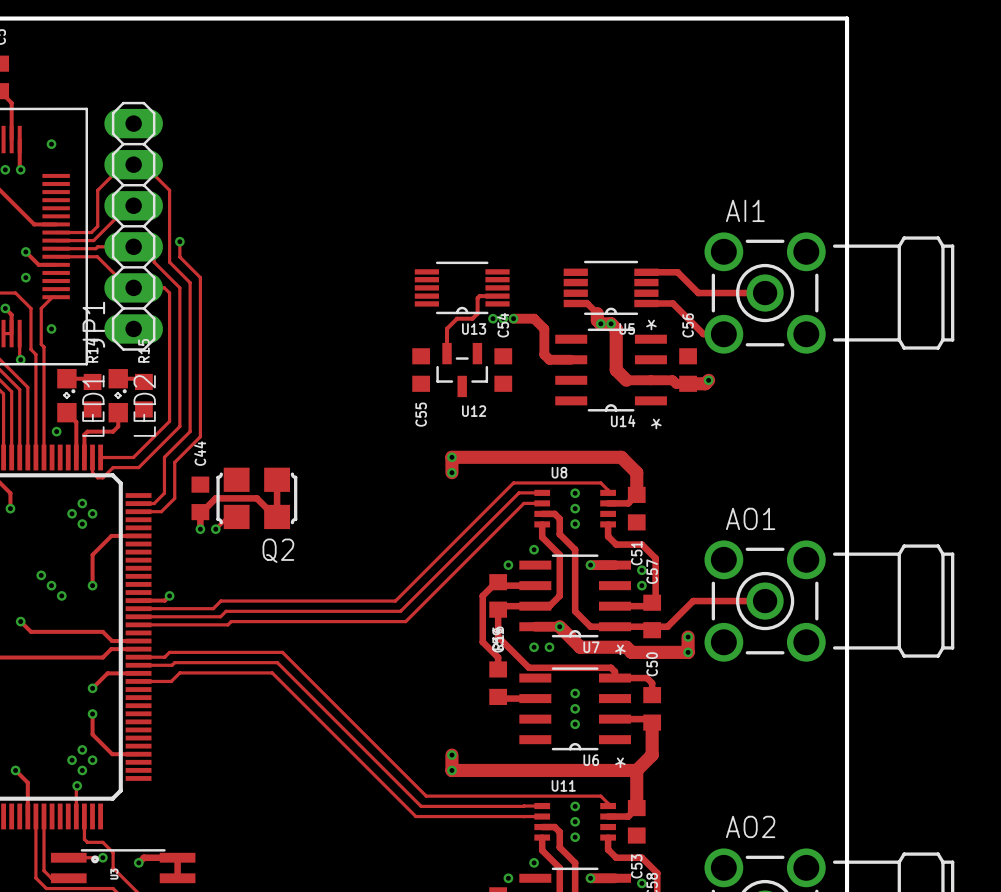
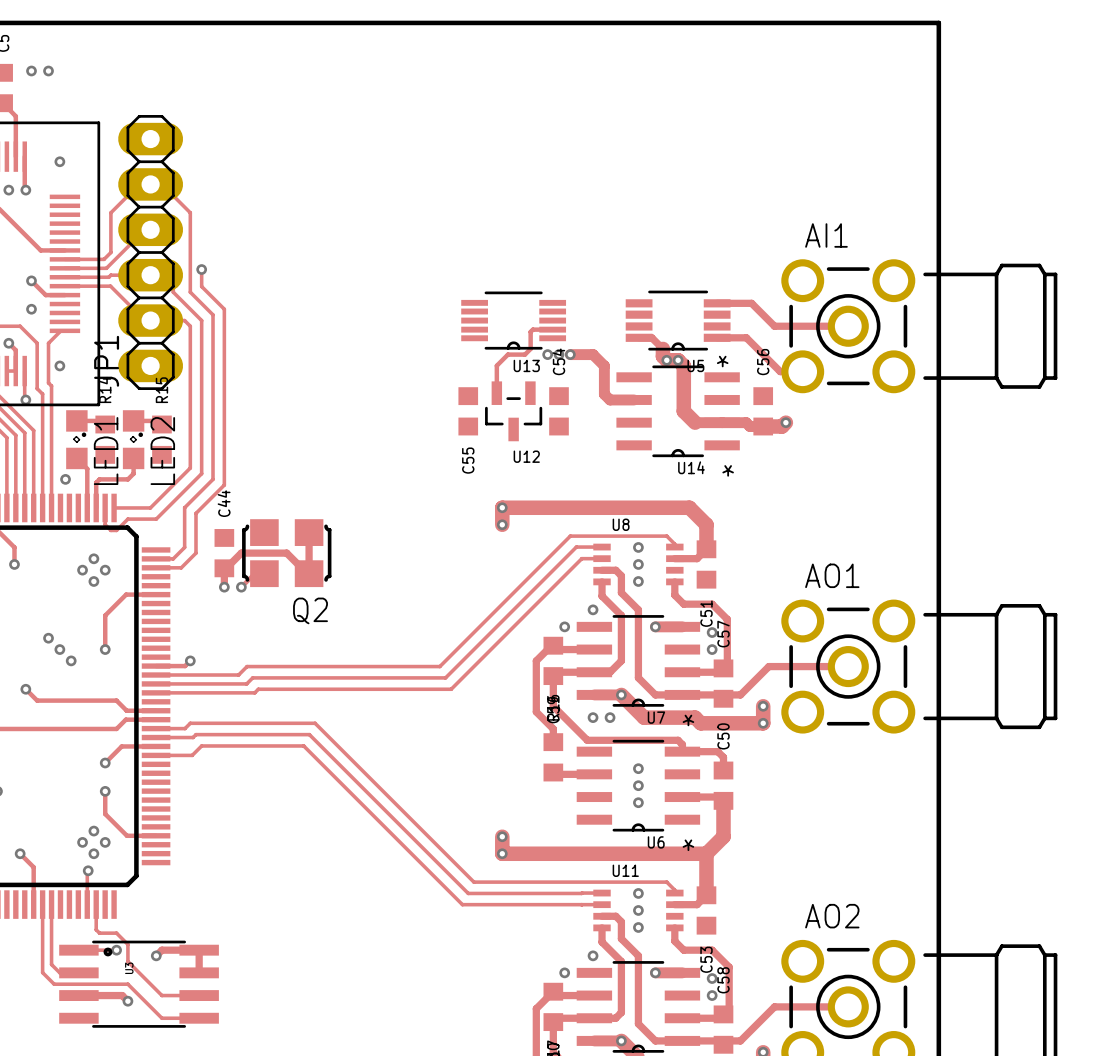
via: none -> (31, 70)
via: none -> (48, 70)

